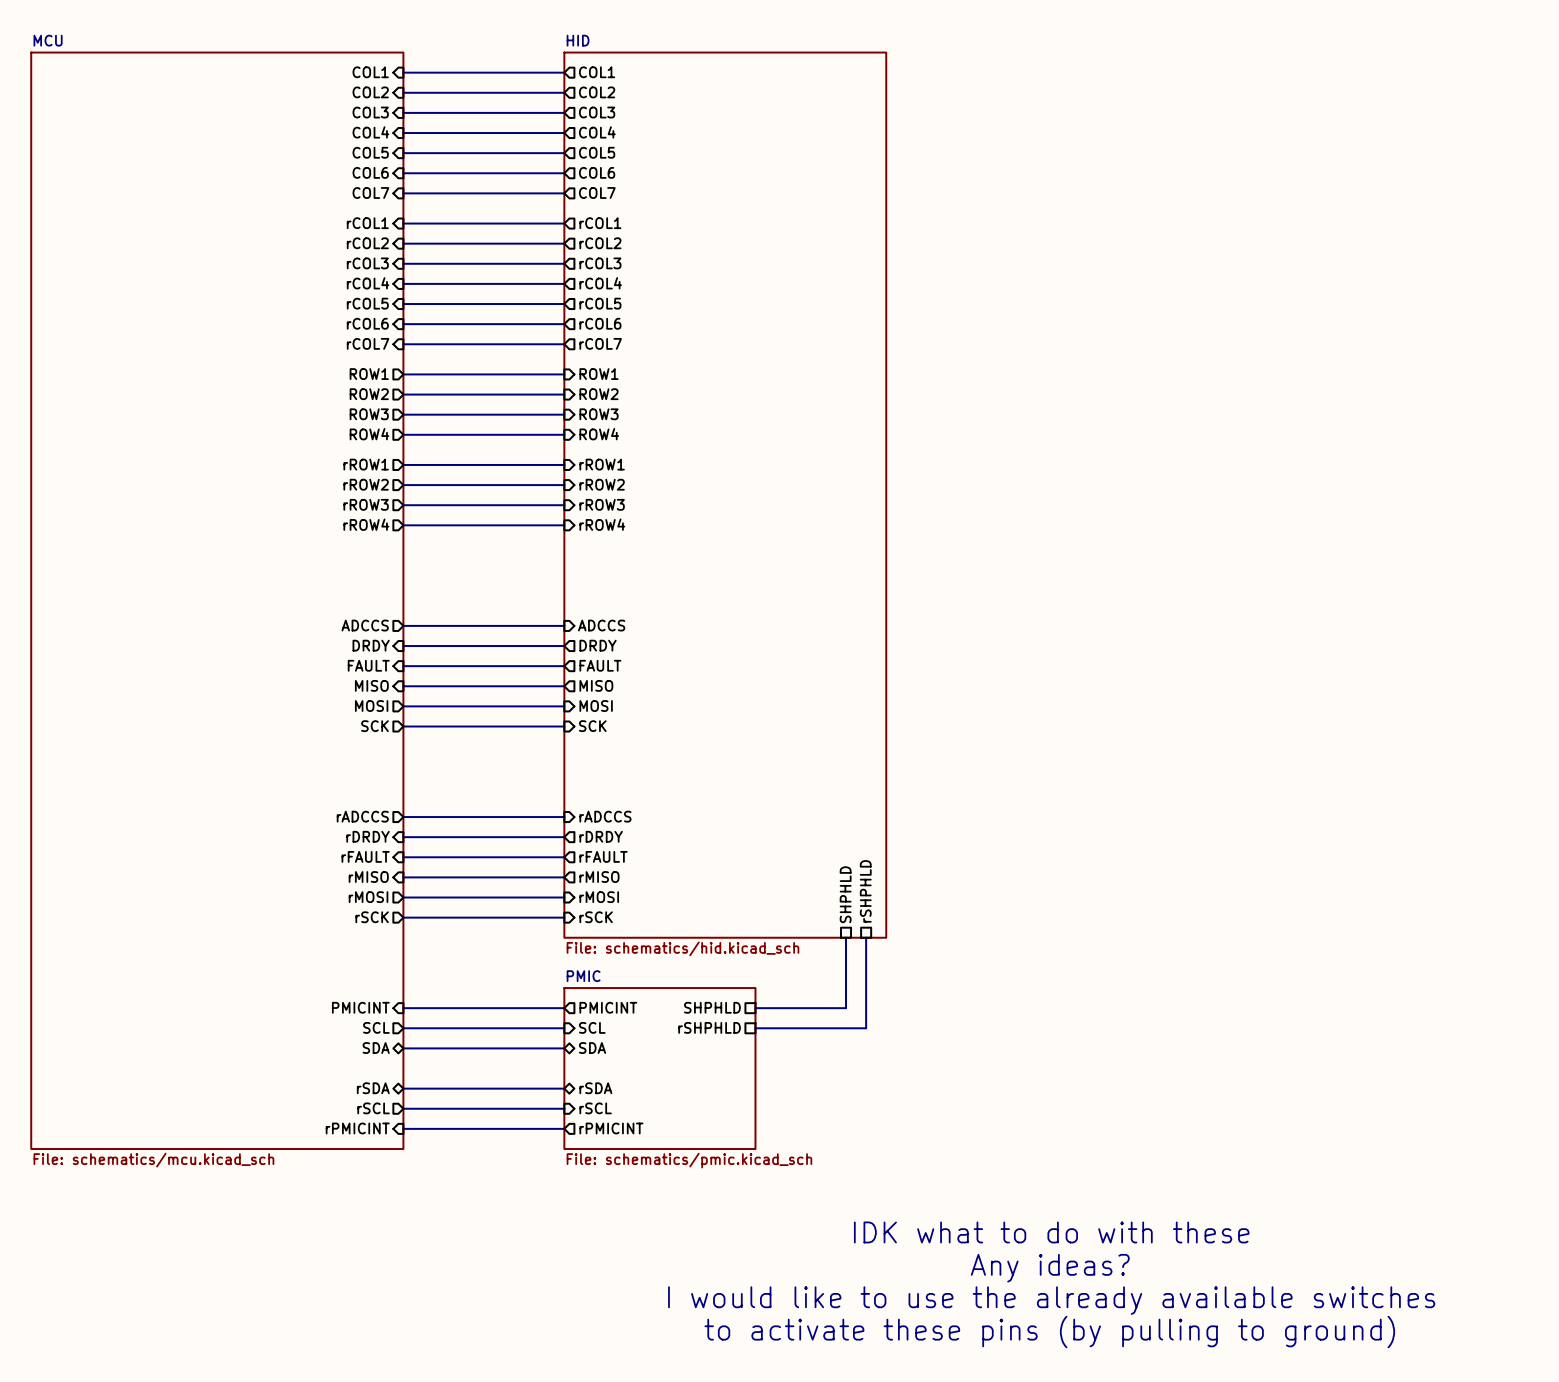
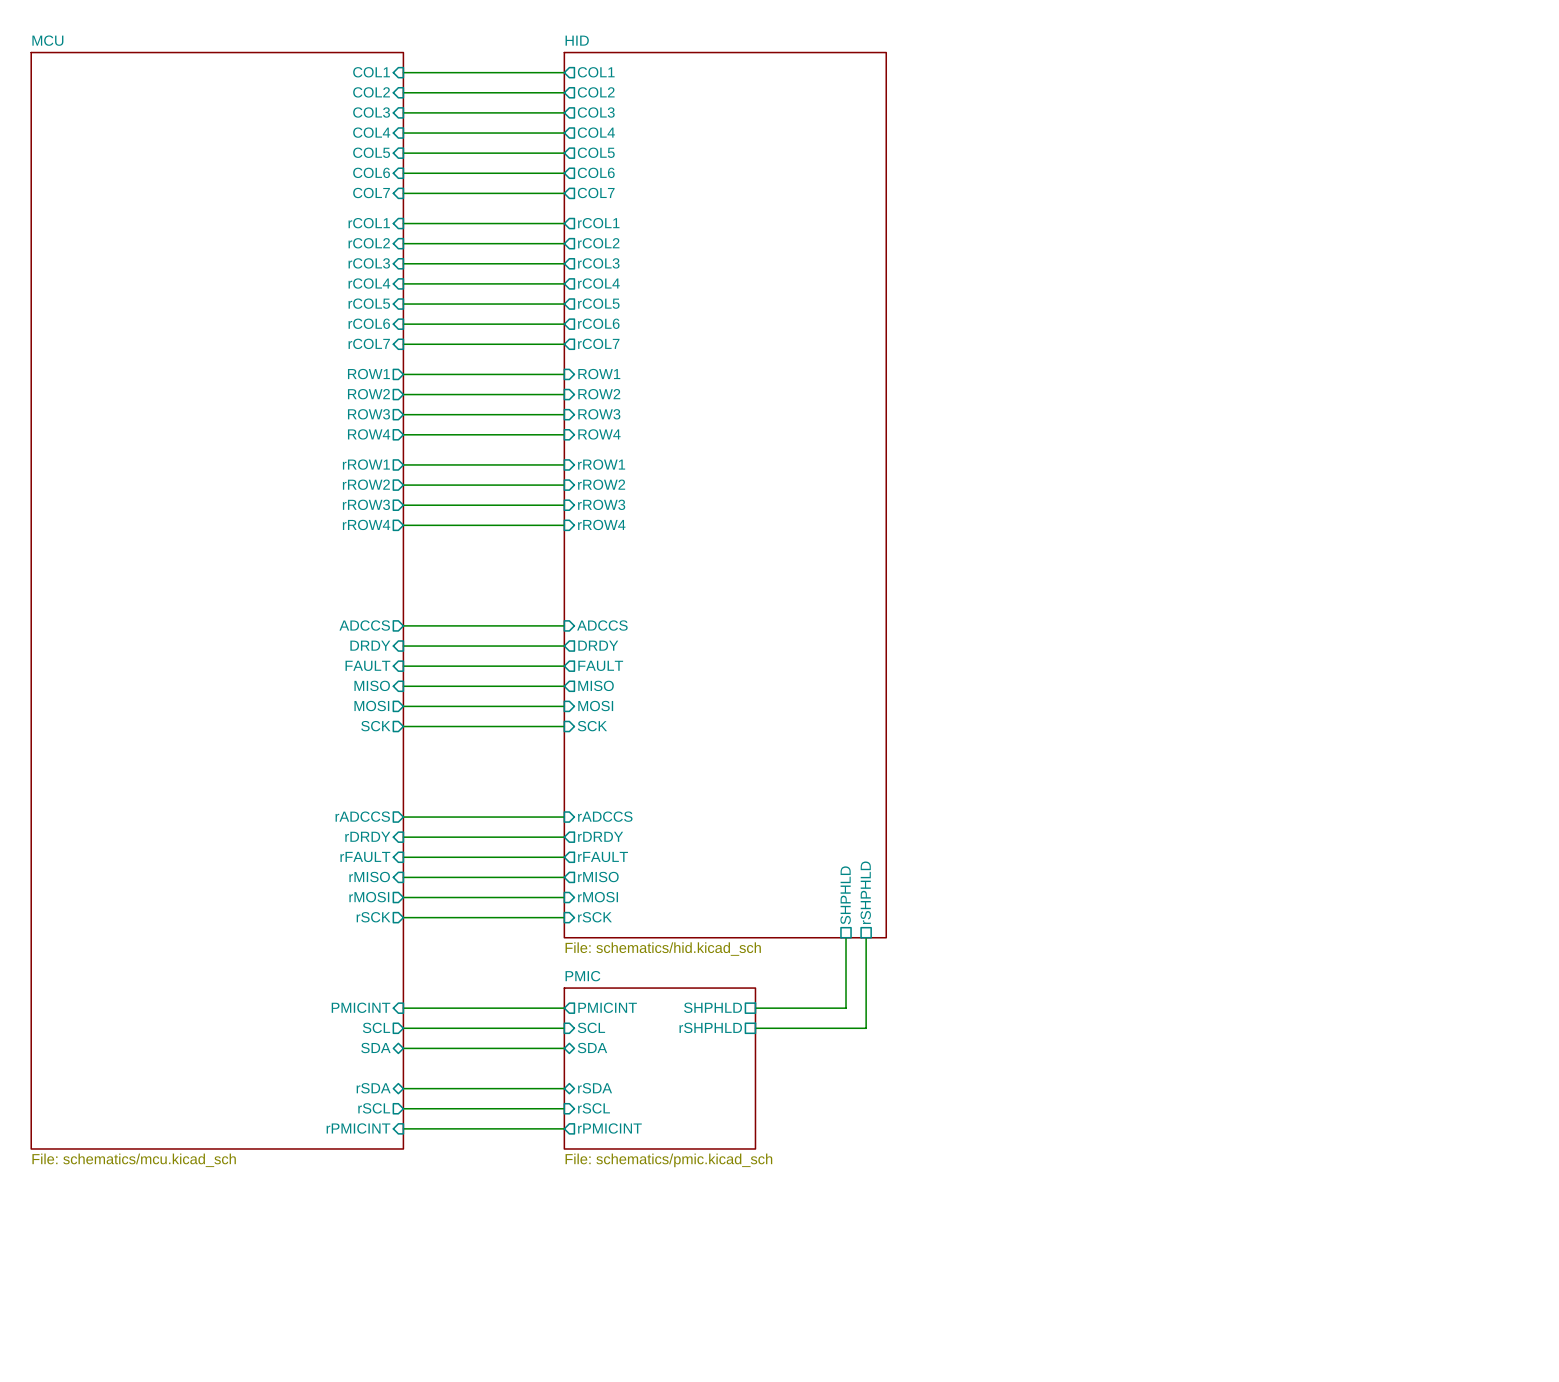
text: IDK what to do with these (1051, 1232) -> none
text: Any ideas? (1050, 1268) -> none
text: I would like to use the already available switches (1051, 1300) -> none
text: to activate these pins (by pulling to ground) (1049, 1332) -> none

